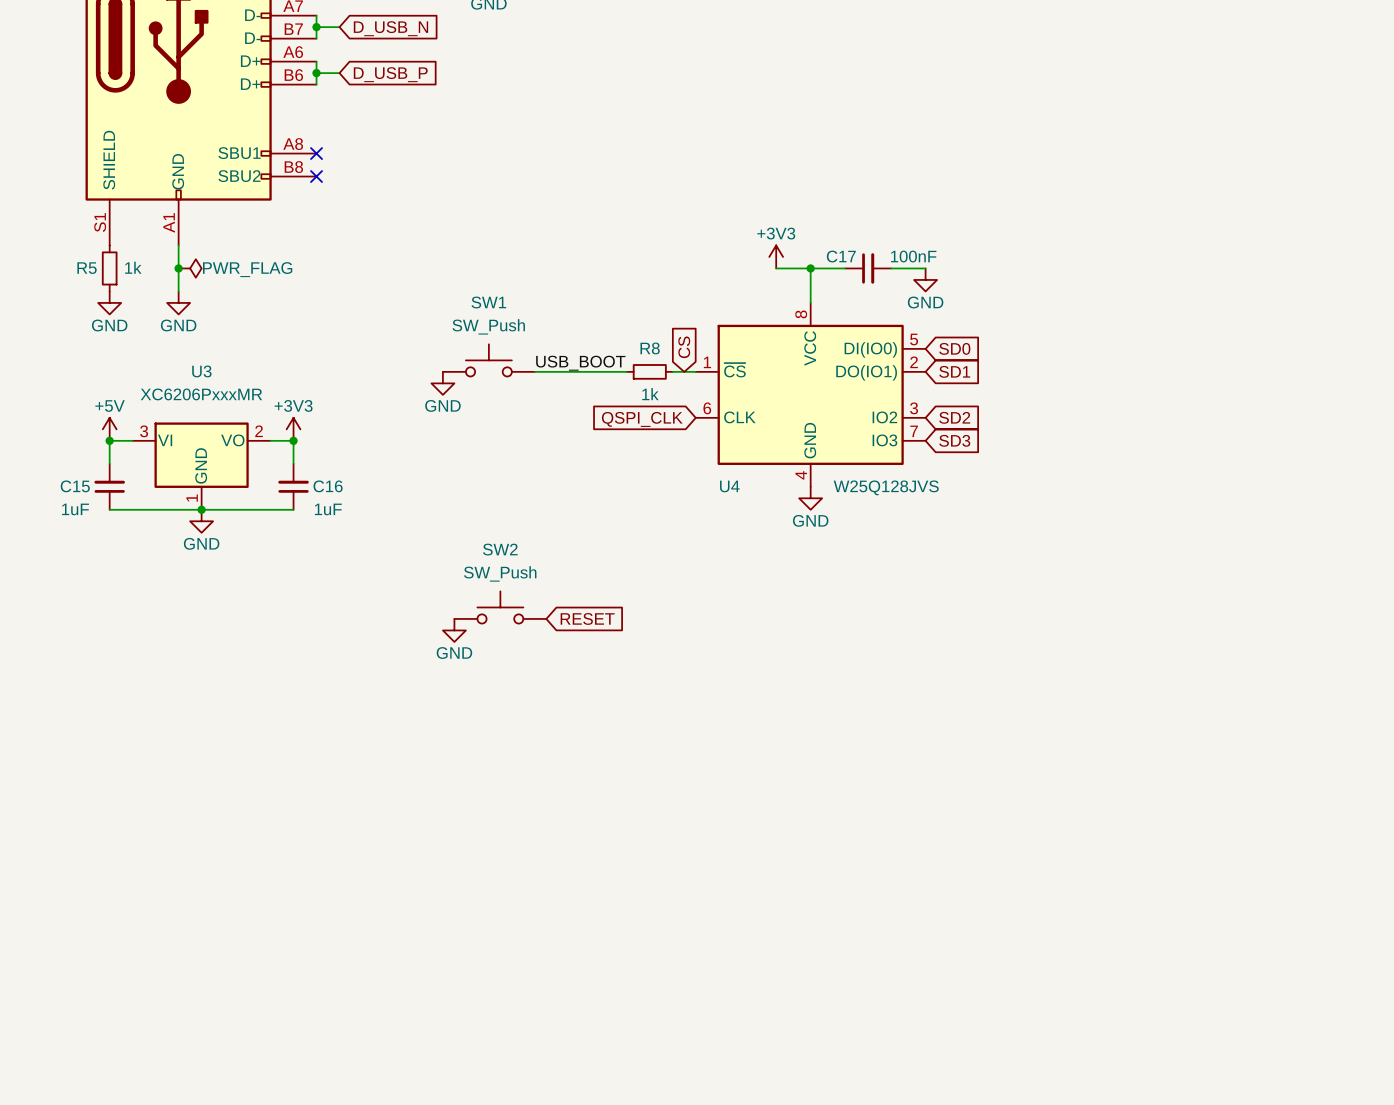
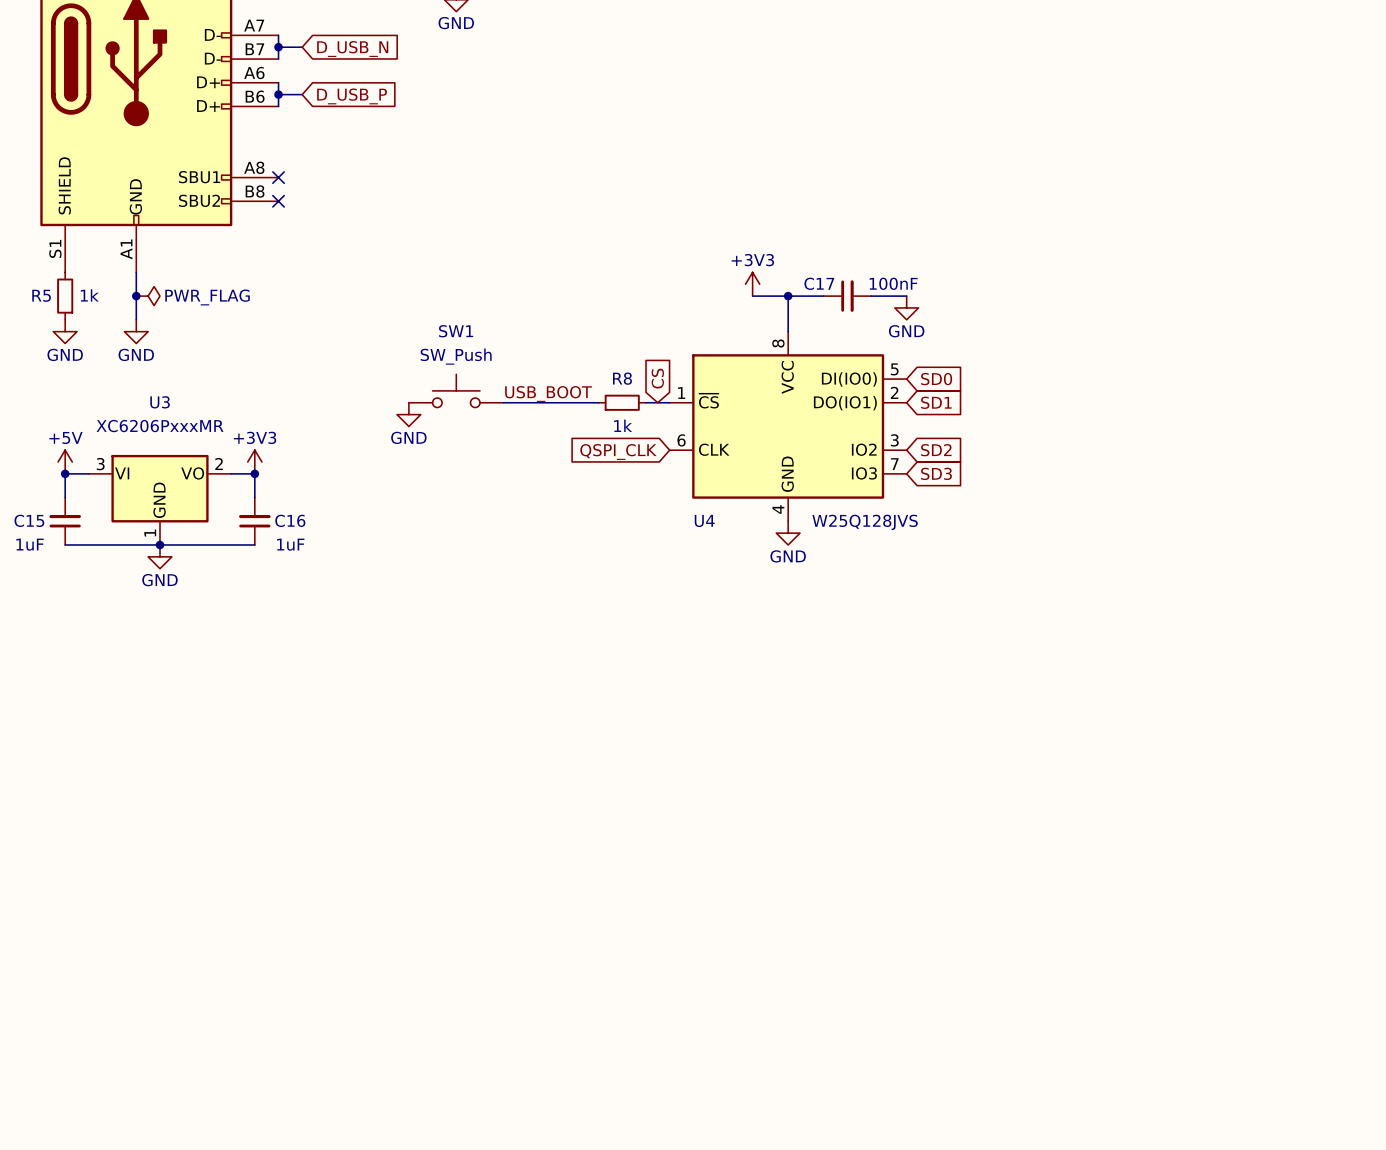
SW2: SW_Push (500, 607) -> none
global label: RESET (587, 618) -> none
power symbol: GND (454, 630) -> none

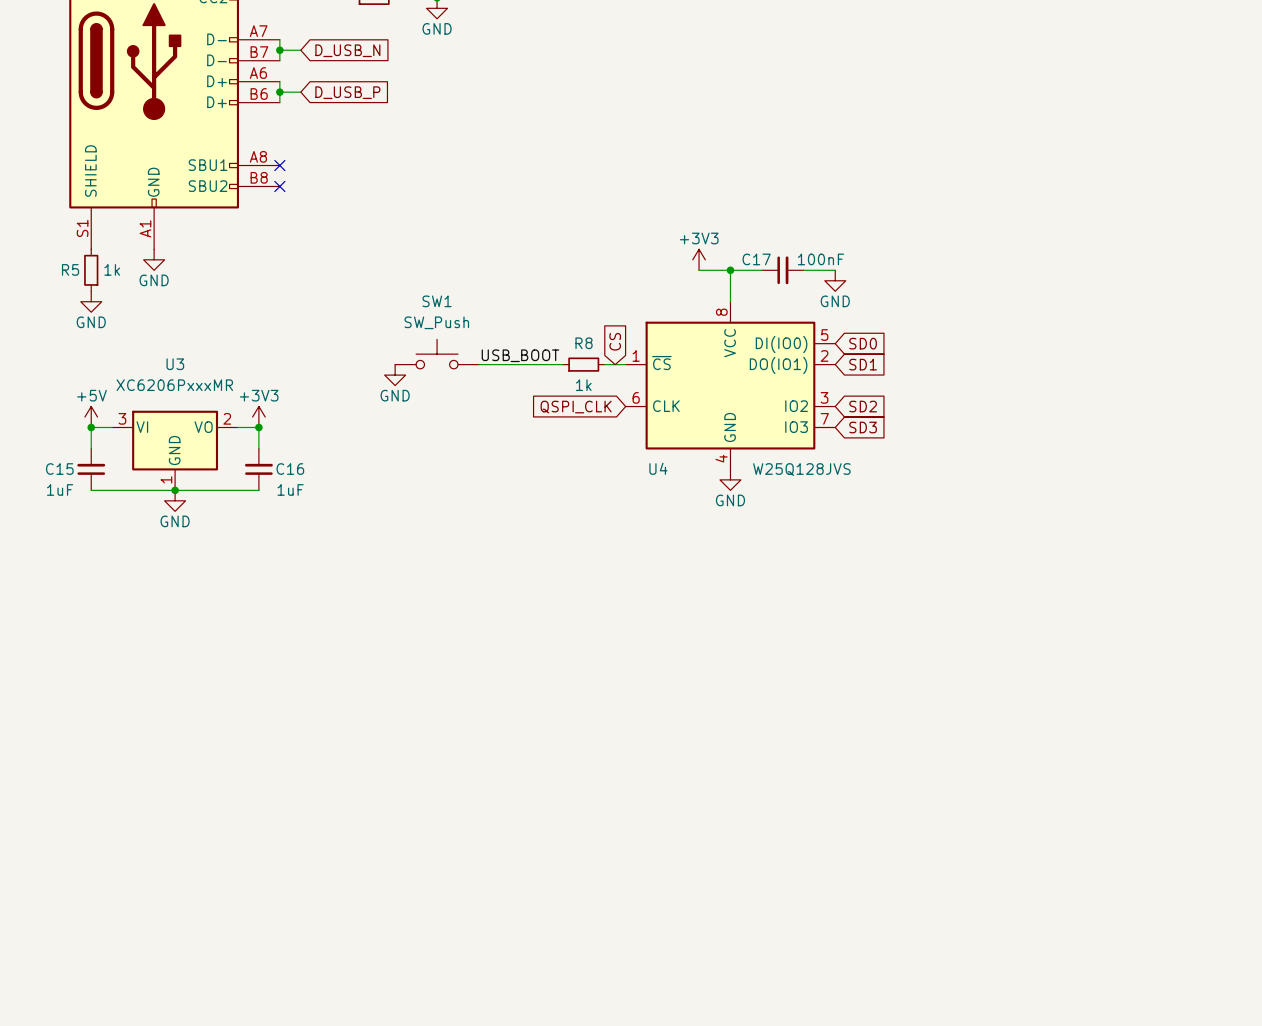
wire: (136, 272) (136, 319) -> none
junction: (136, 296) -> none
power symbol: PWR_FLAG (148, 296) -> none
power symbol position: GND (136, 331) -> GND (154, 259)

